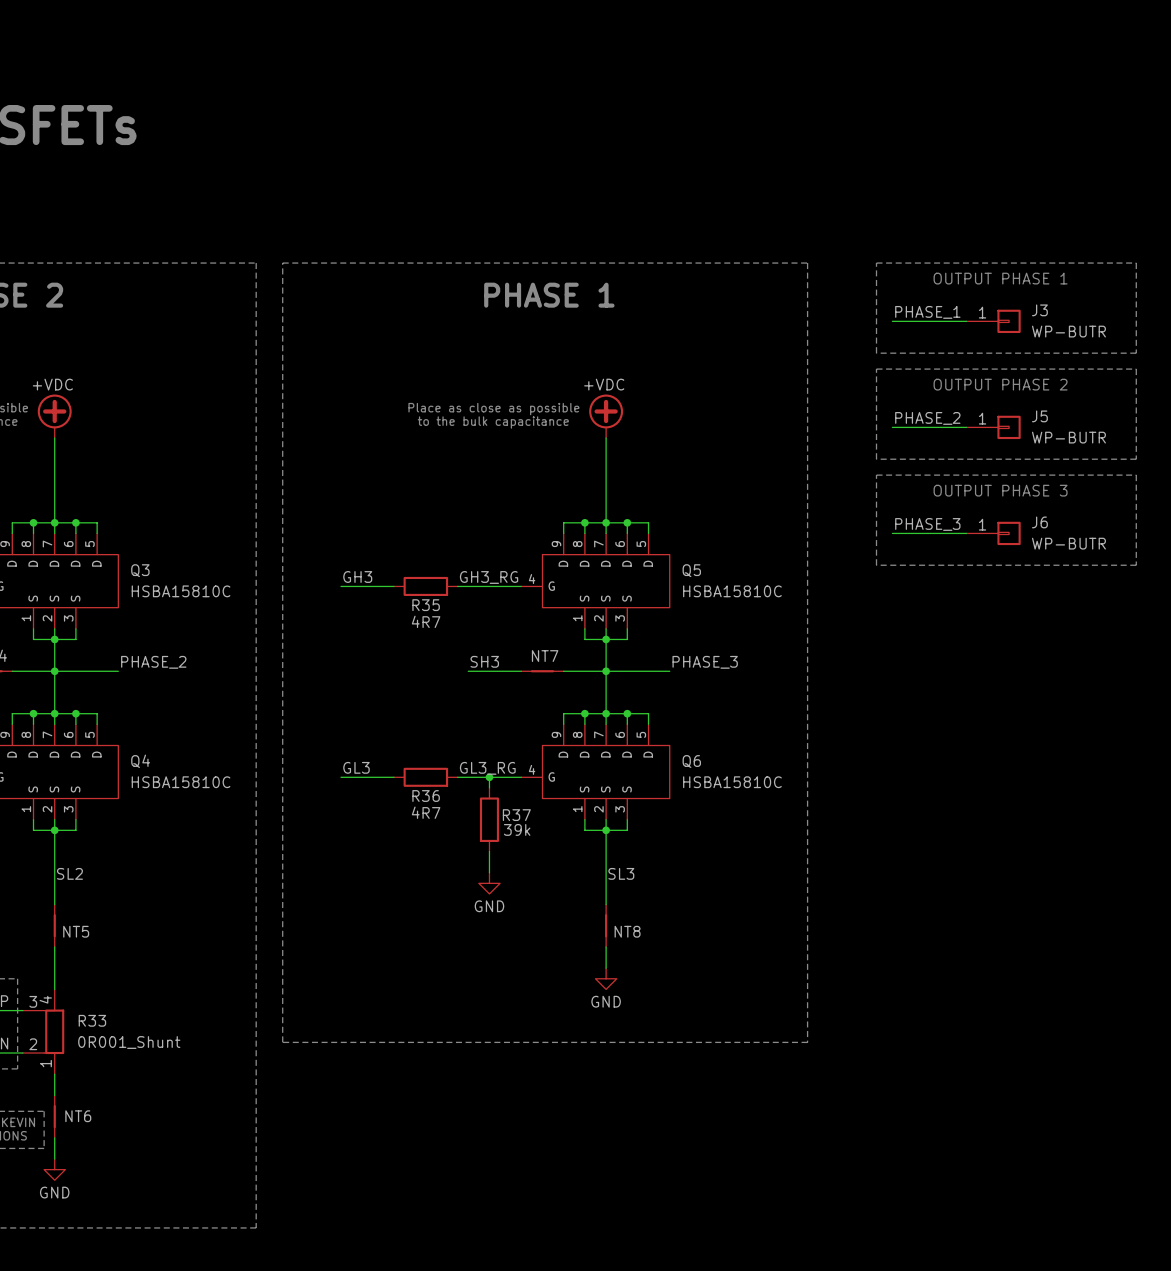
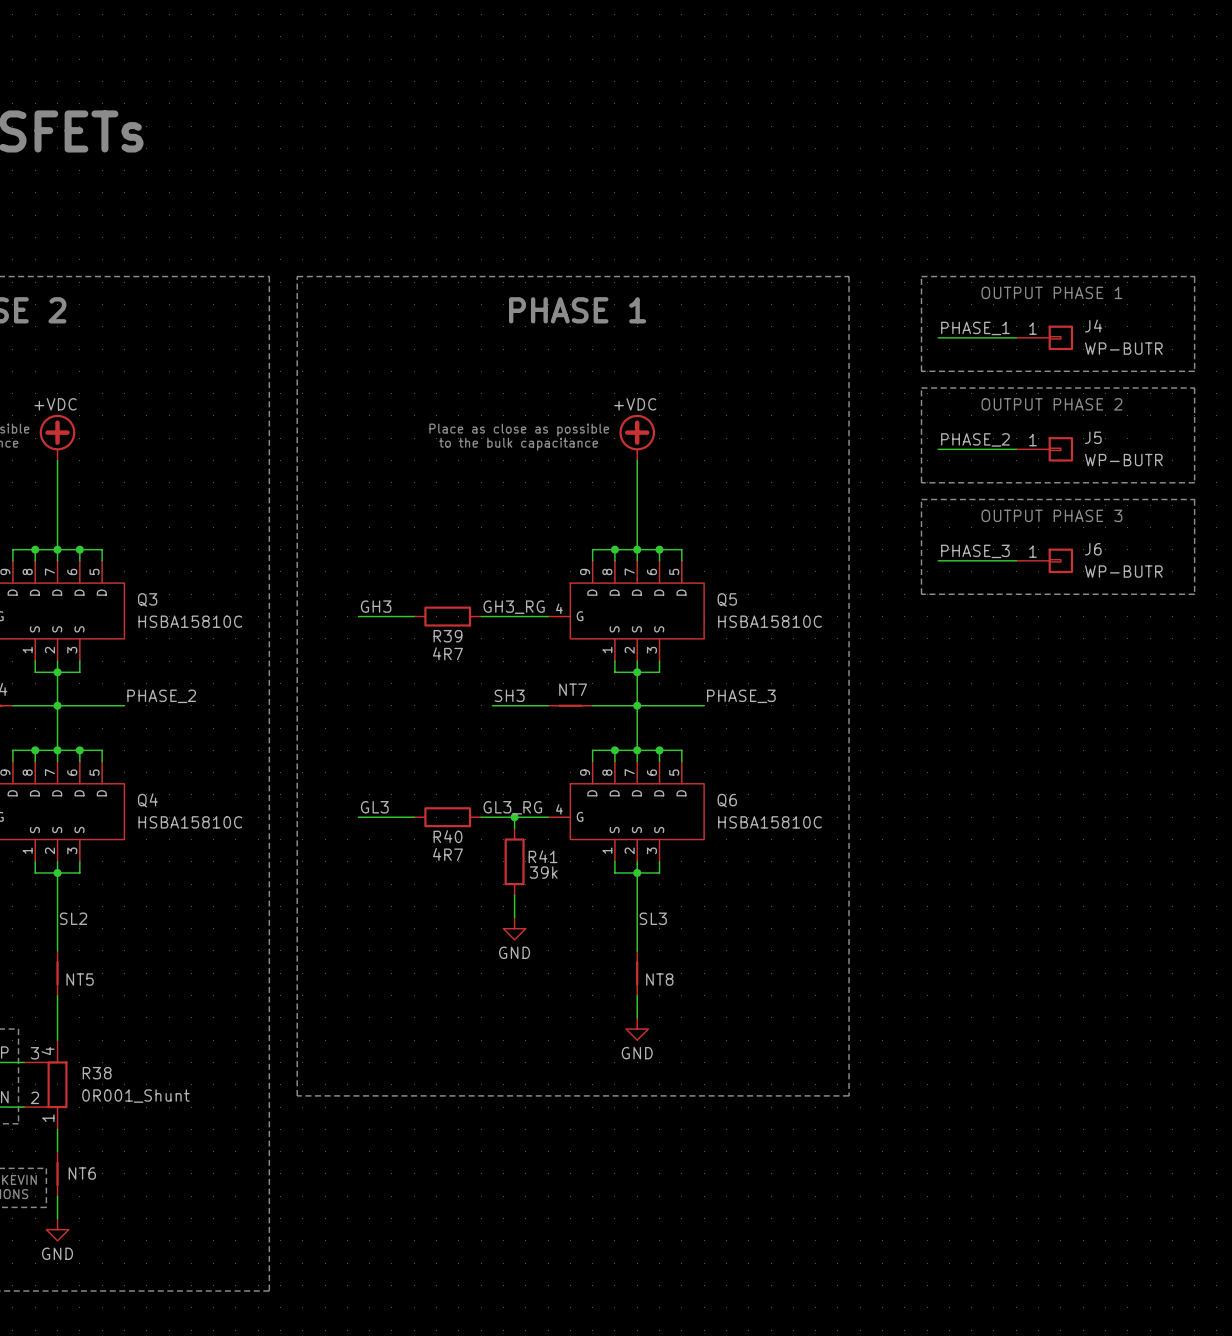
J3 name: J3 (1039, 310) -> J4 (1093, 326)
R35 name: R35 (426, 605) -> R39 (447, 636)
R36 name: R36 (426, 796) -> R40 (447, 836)
R37 name: R37 (516, 815) -> R41 (543, 856)
R33 name: R33 (92, 1020) -> R38 (97, 1073)

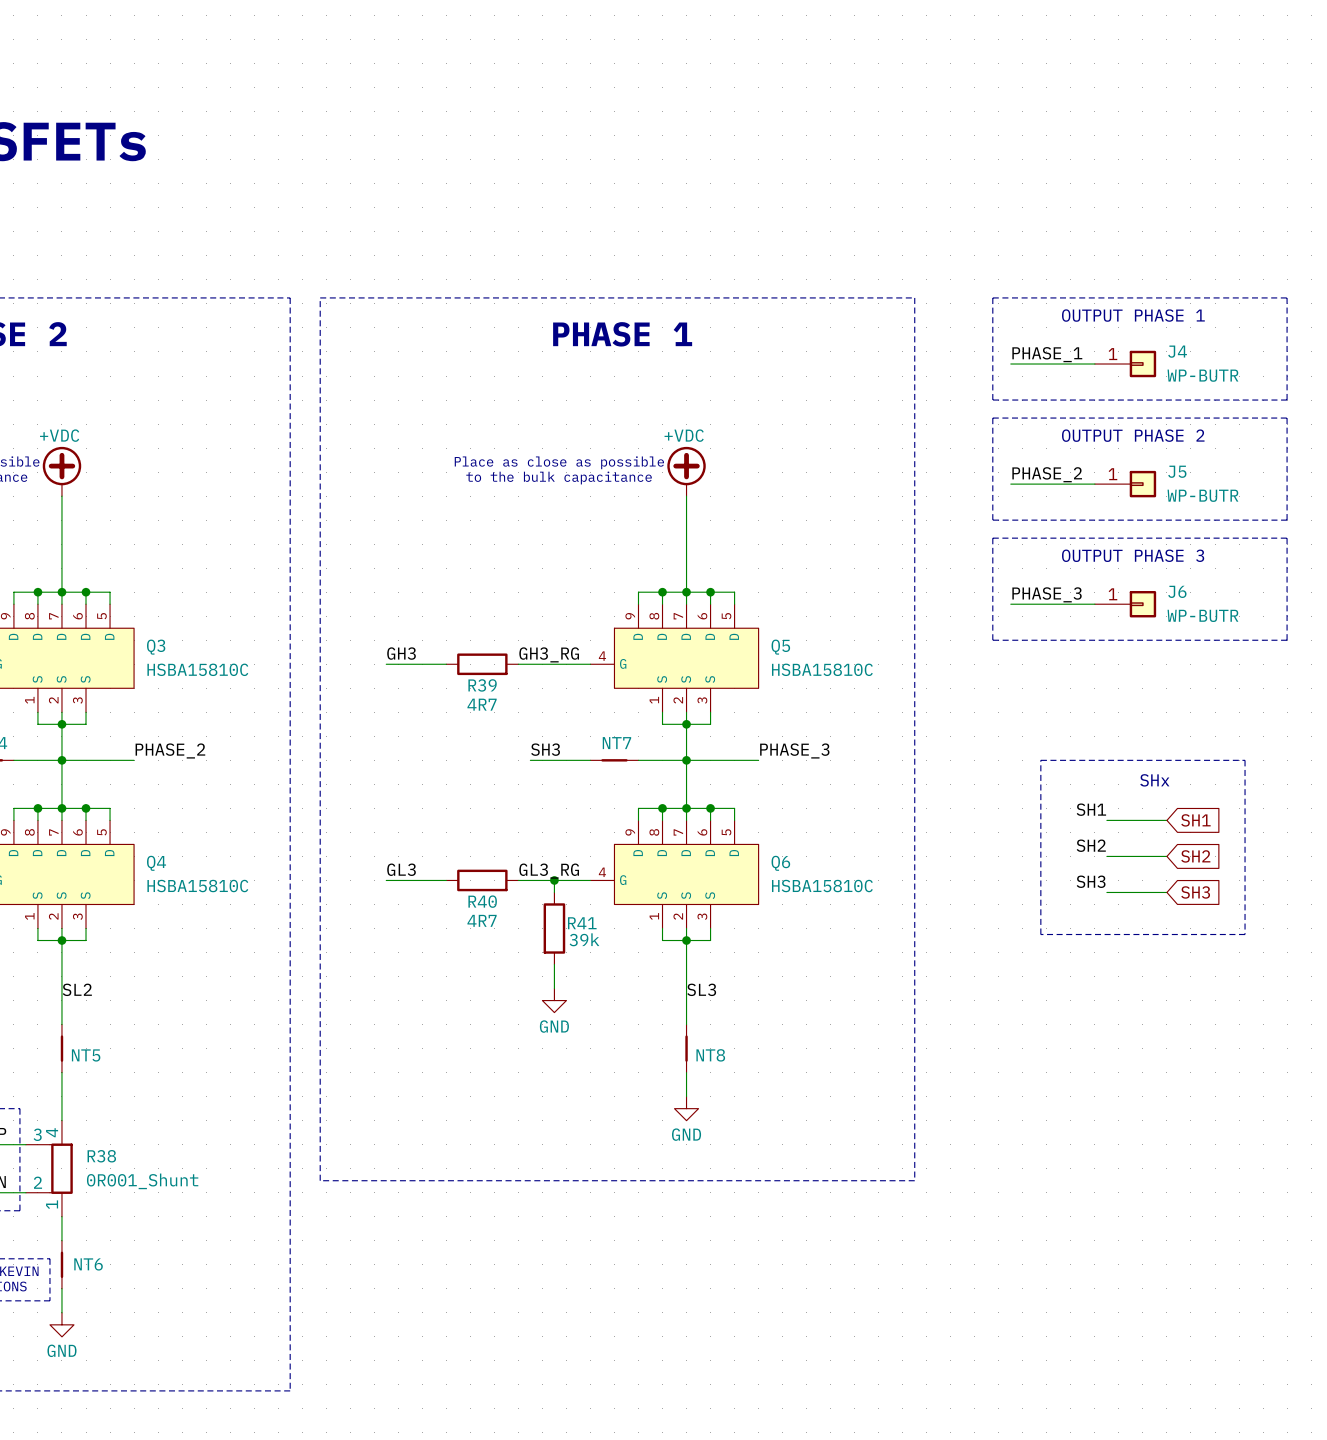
line: none -> (1040, 760) (1245, 760) (1245, 934) (1040, 934) (1040, 760)
text: none -> SHx (1154, 780)
label: none -> SH1 (1091, 809)
wire: none -> (1106, 820) (1166, 820)
global label: none -> SH1 (1195, 820)
label: none -> SH2 (1091, 845)
wire: none -> (1106, 856) (1166, 856)
global label: none -> SH2 (1195, 856)
label: none -> SH3 (1091, 881)
wire: none -> (1106, 892) (1166, 892)
global label: none -> SH3 (1195, 892)

